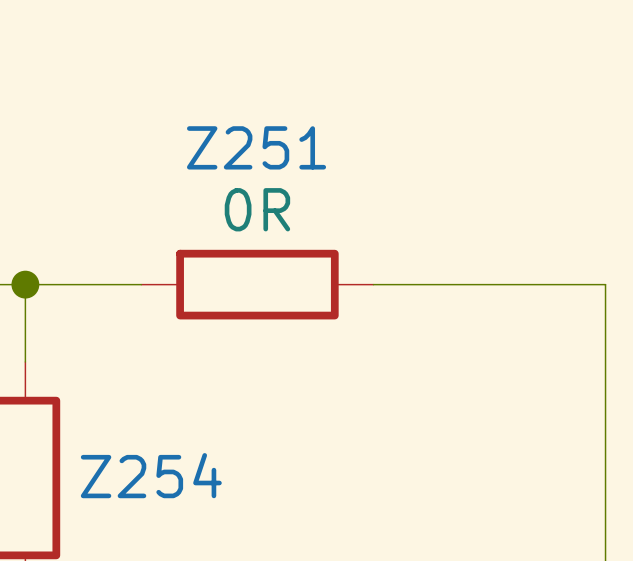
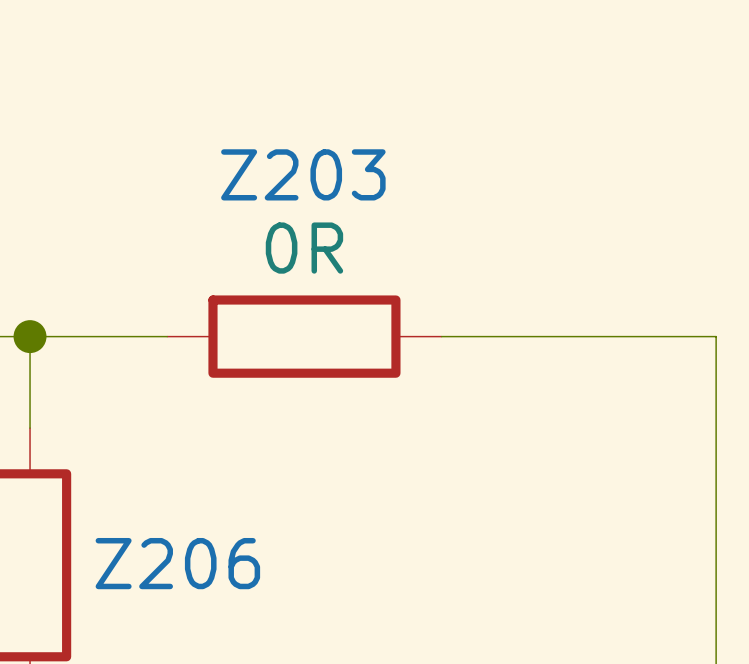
Z251 name: Z251 (256, 147) -> Z203 (303, 174)
Z254 name: Z254 (151, 475) -> Z206 (177, 563)

